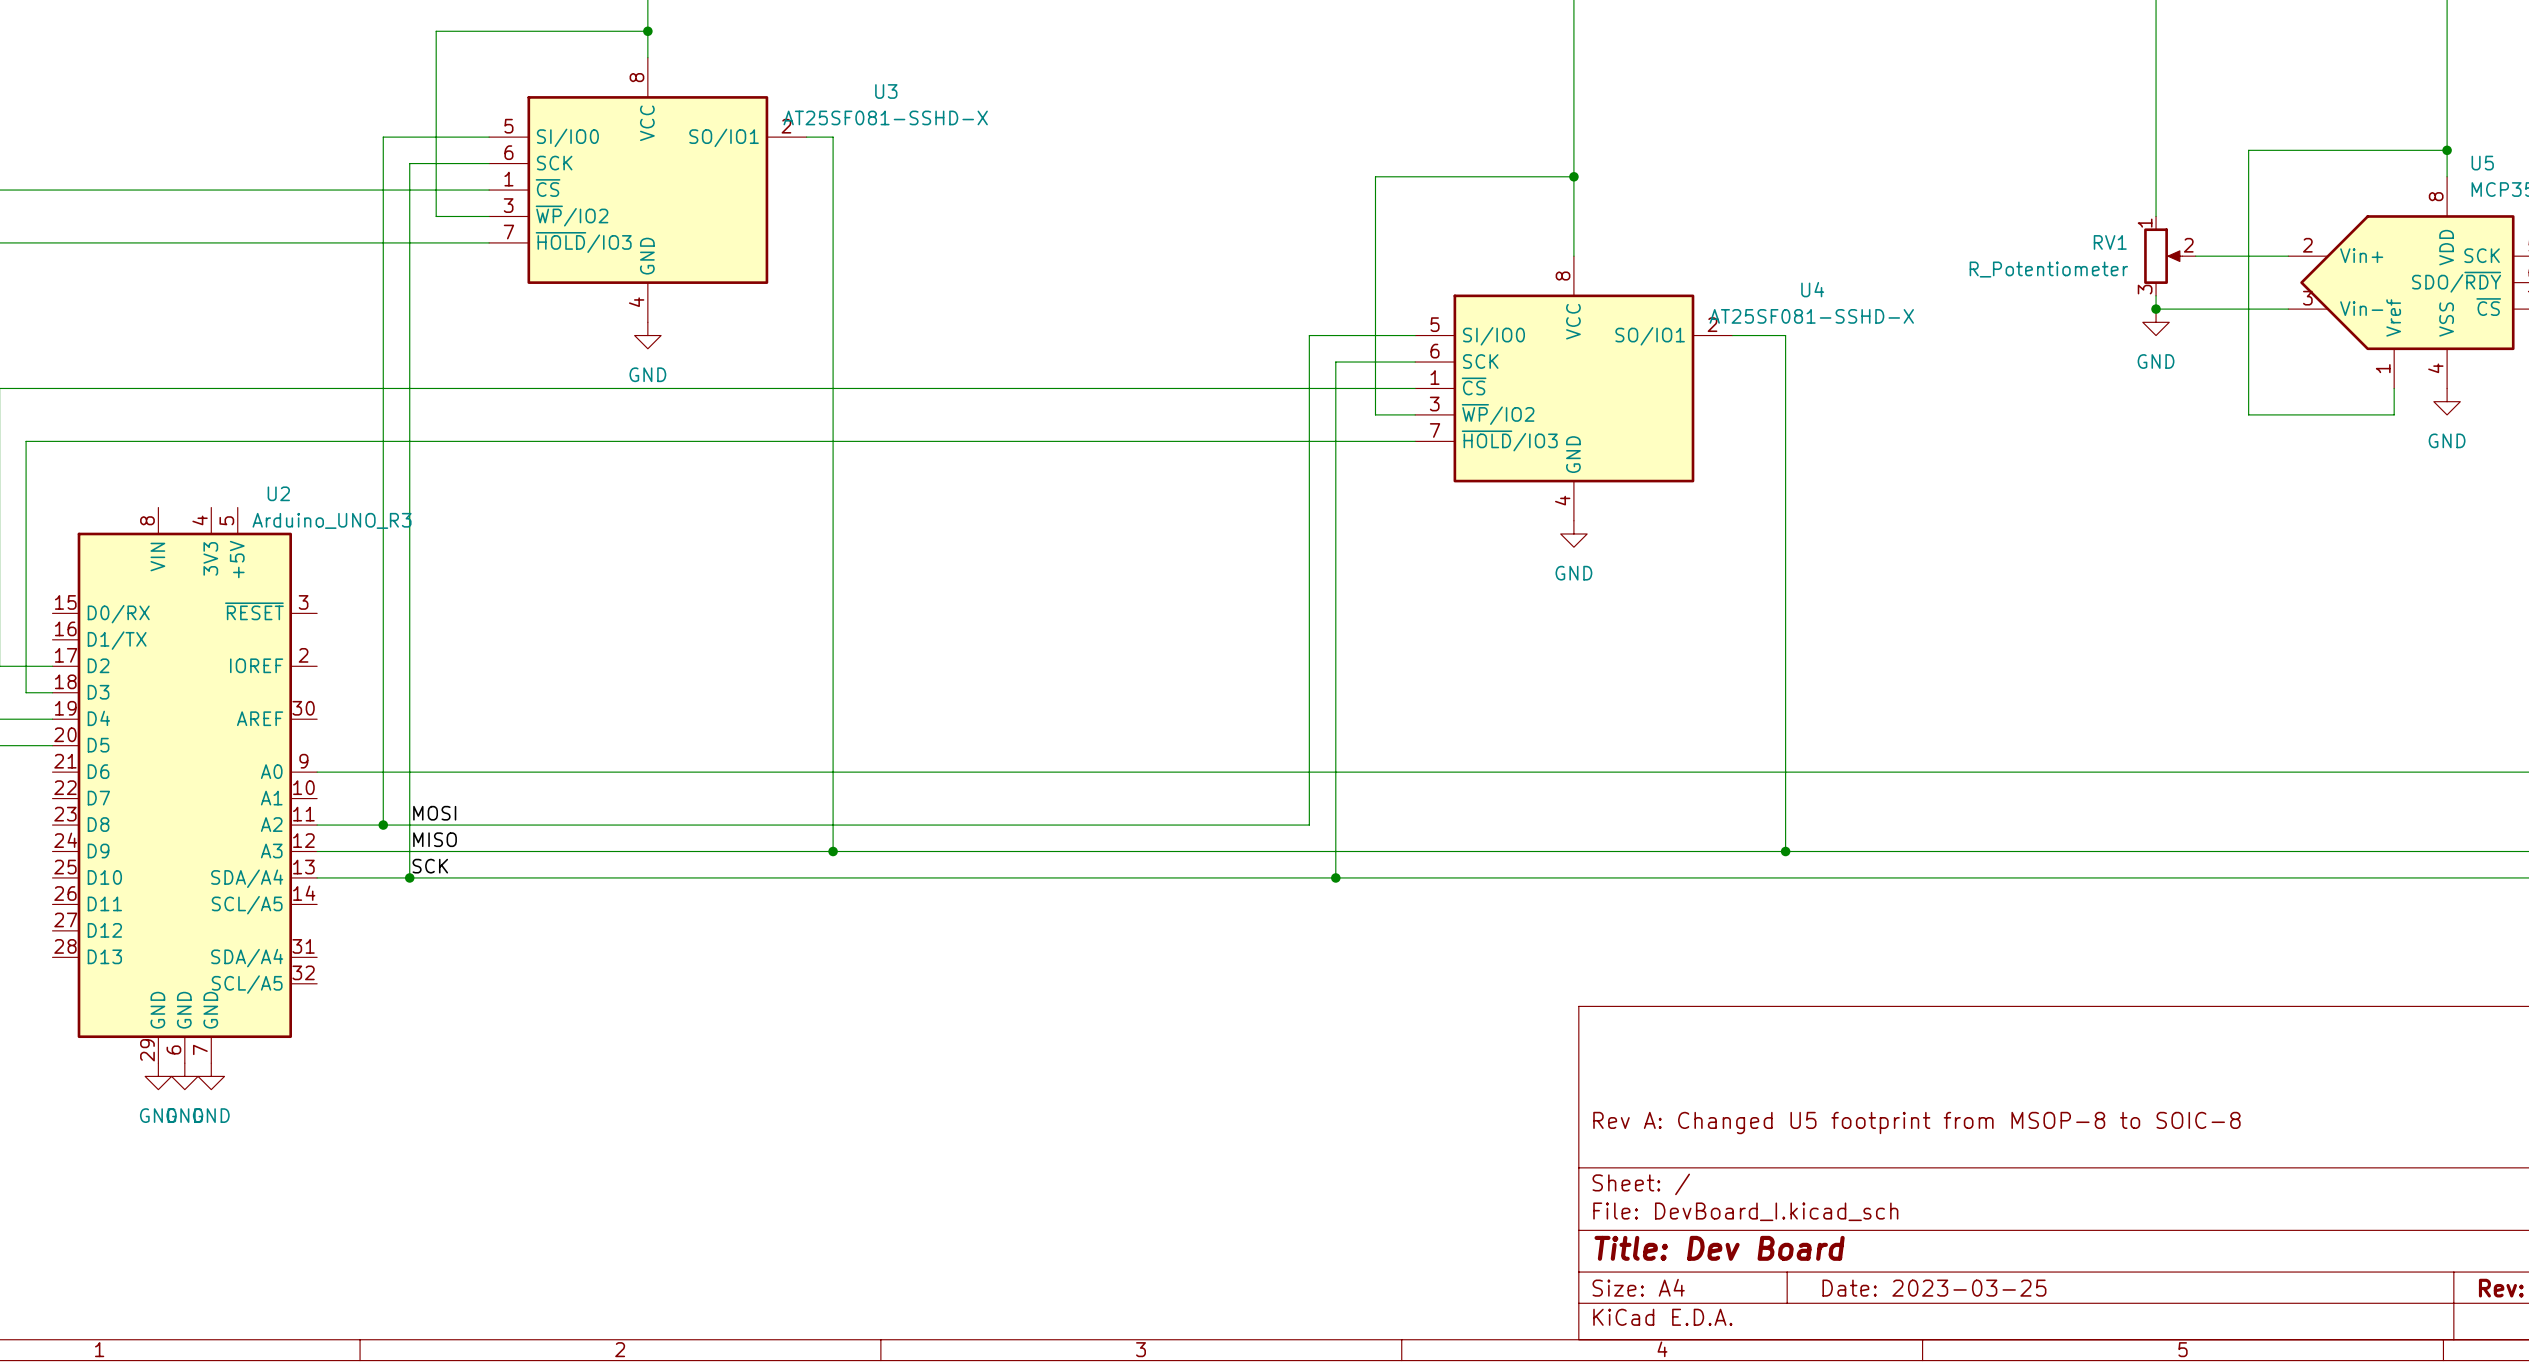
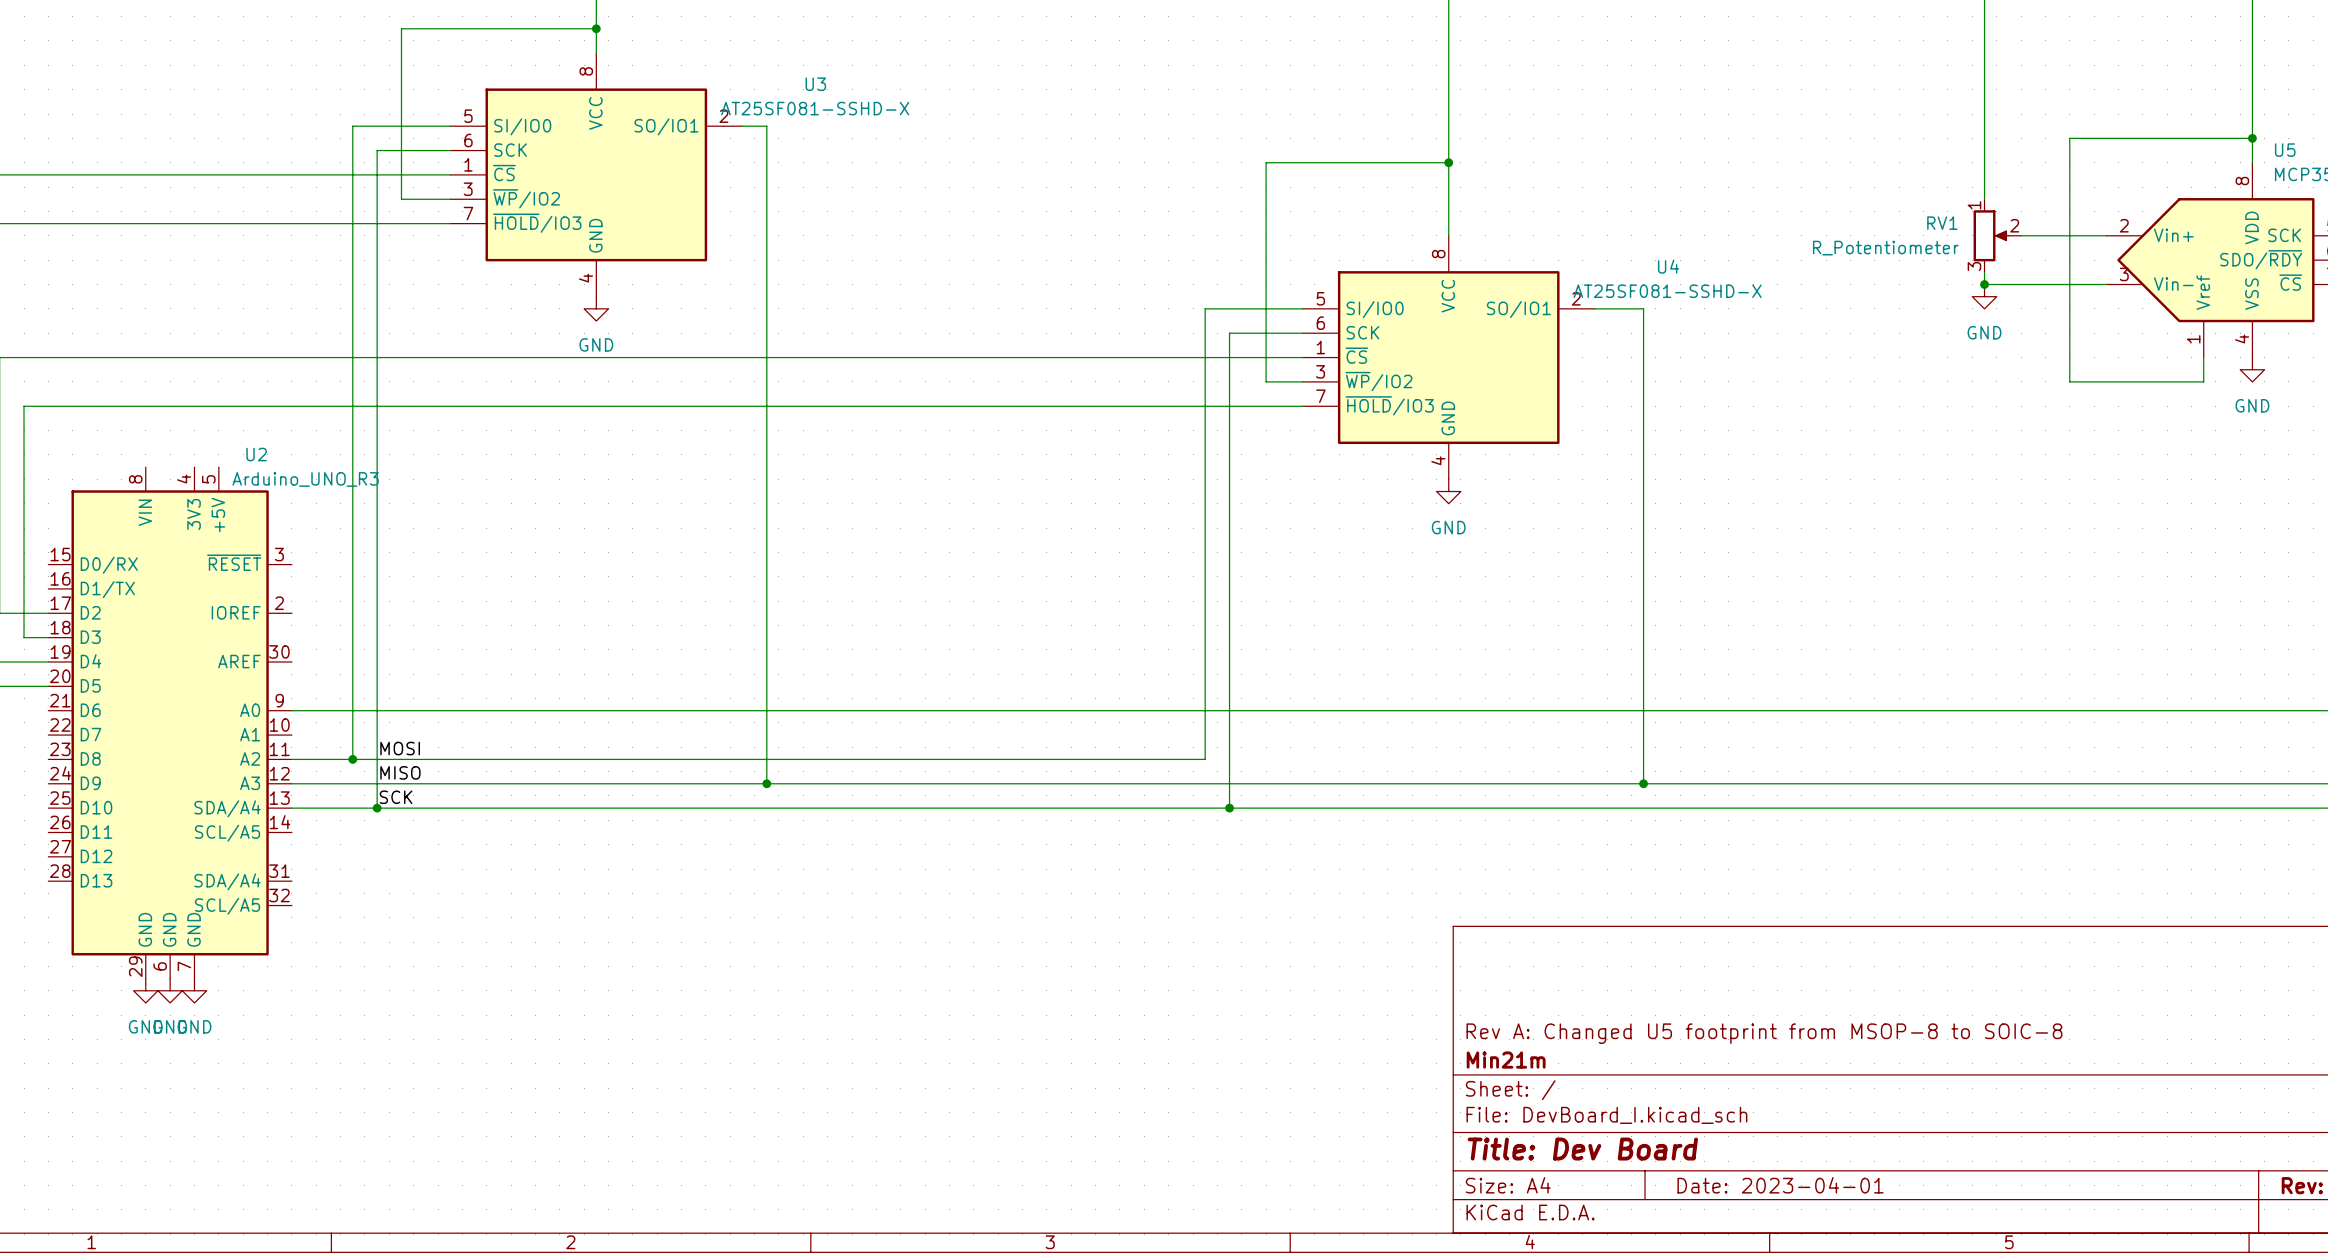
title block: none -> Min21m (1506, 1060)
title block: Date: 2023-03-25 (1934, 1288) -> Date: 2023-04-01 (1780, 1185)

